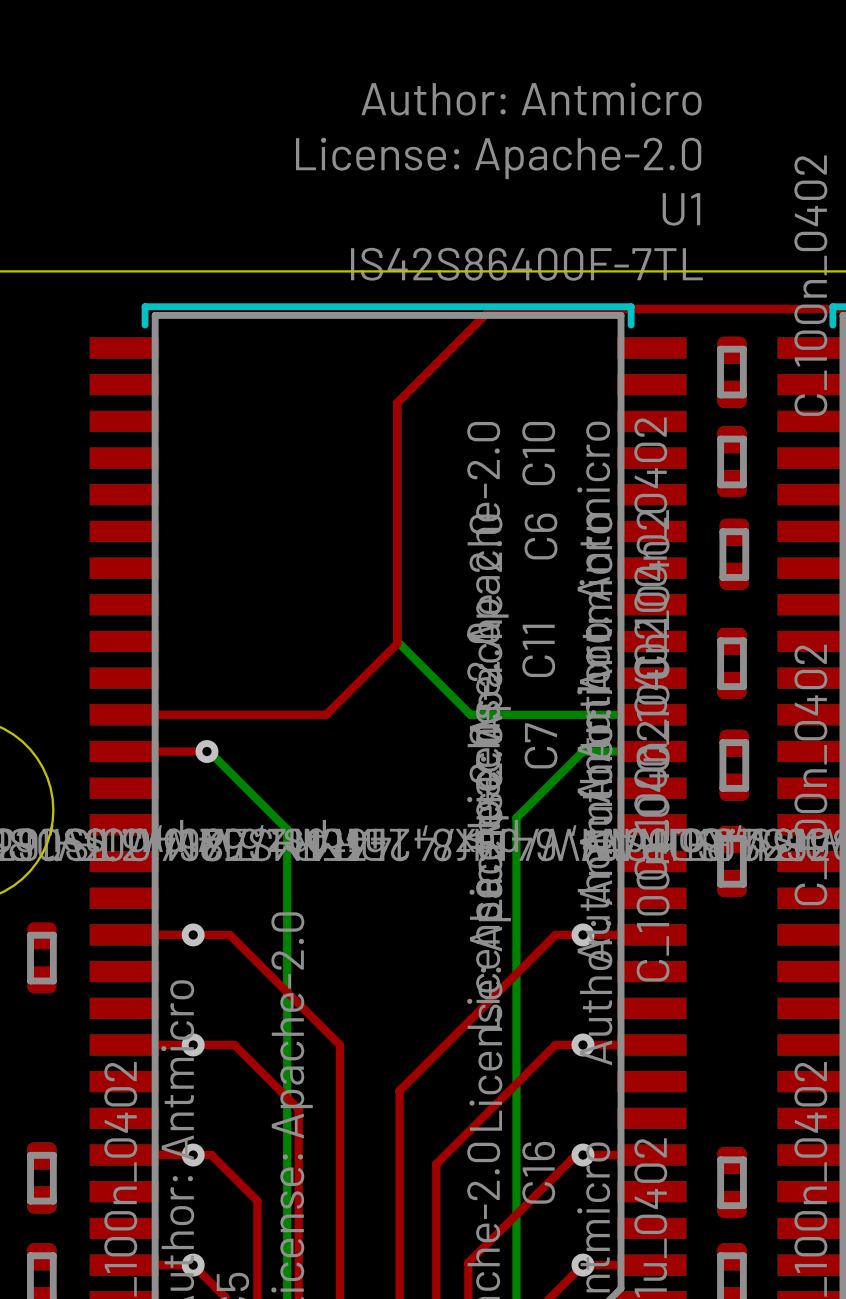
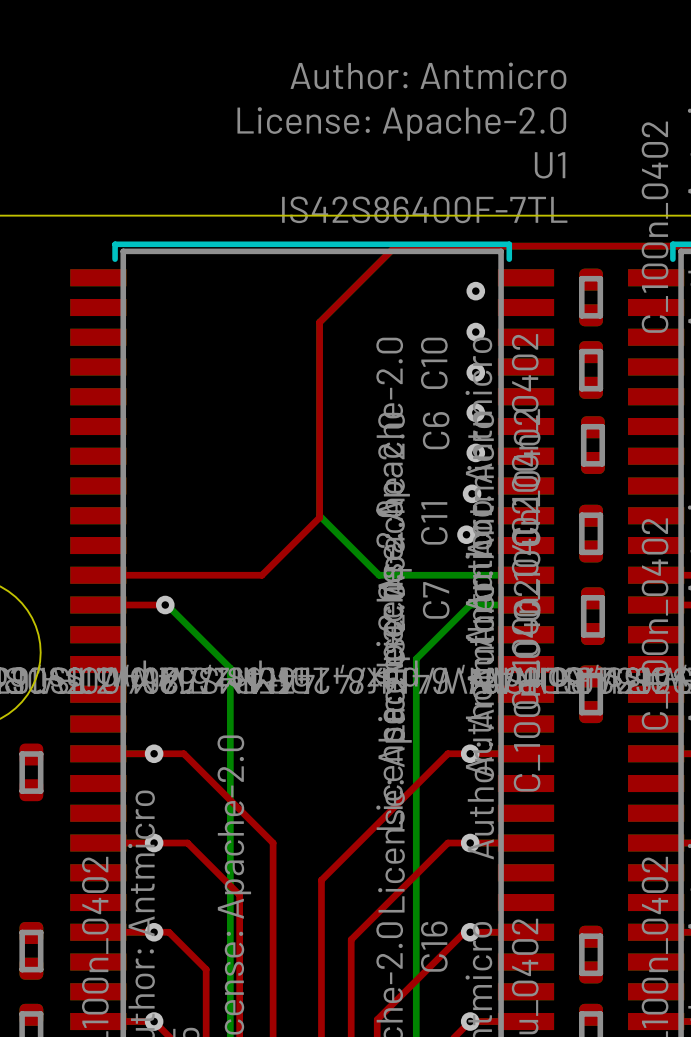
via: none -> (475, 291)
via: none -> (475, 332)
via: none -> (475, 372)
via: none -> (475, 412)
via: none -> (475, 452)
via: none -> (472, 493)
via: none -> (466, 534)

